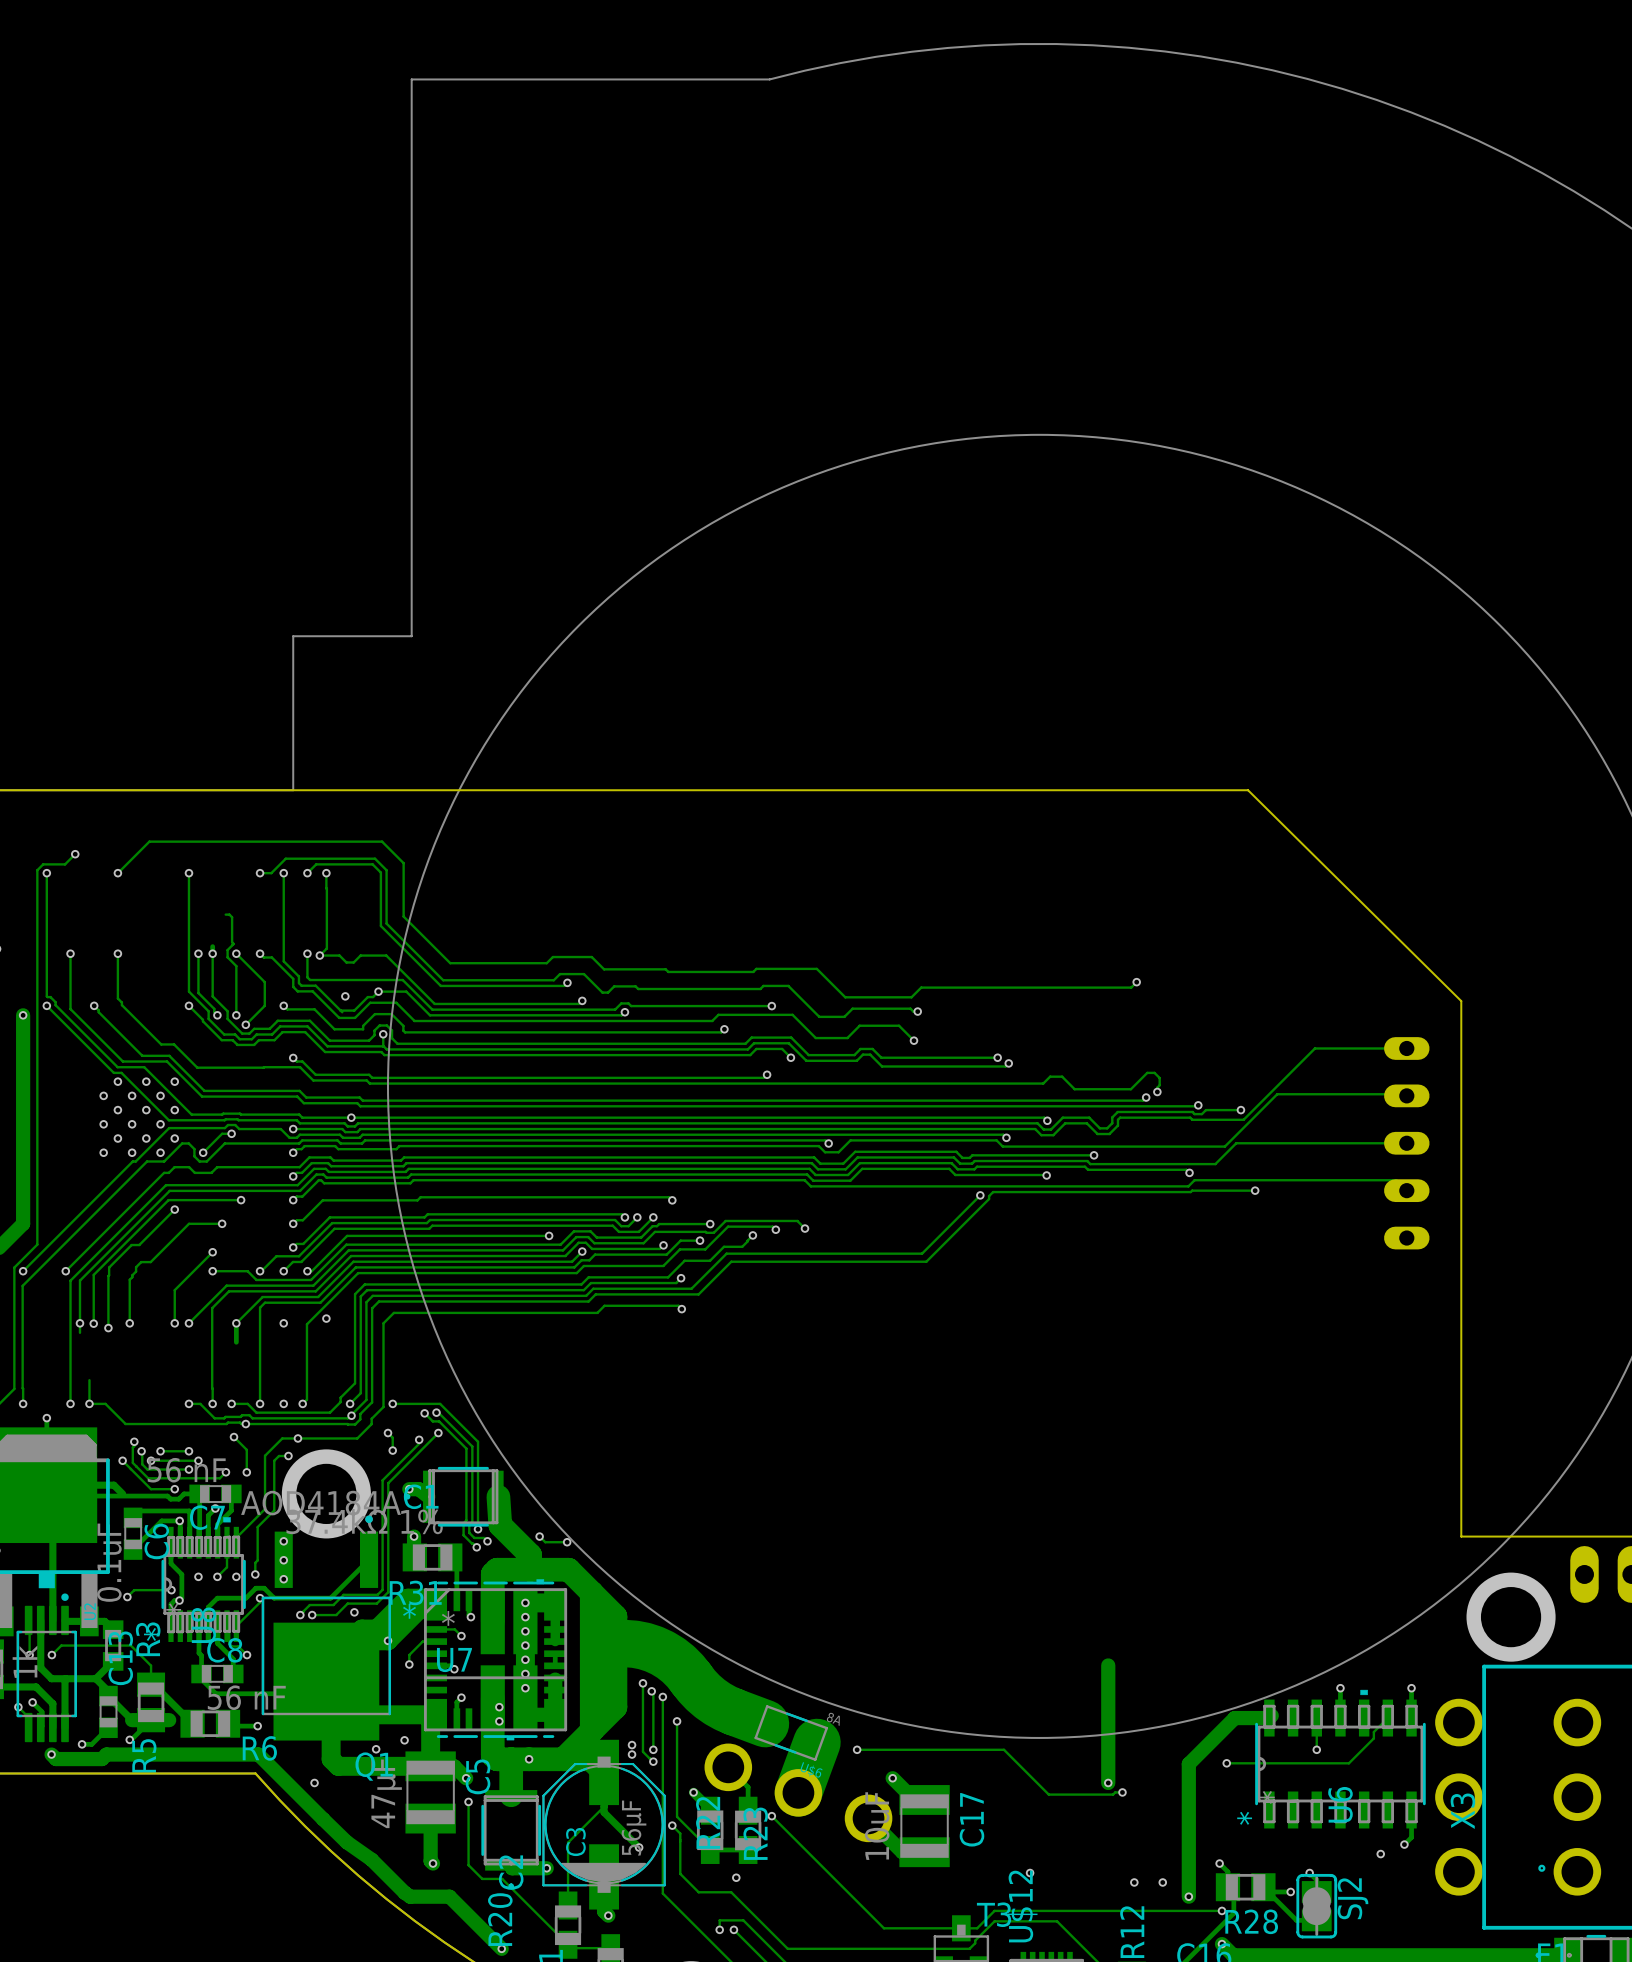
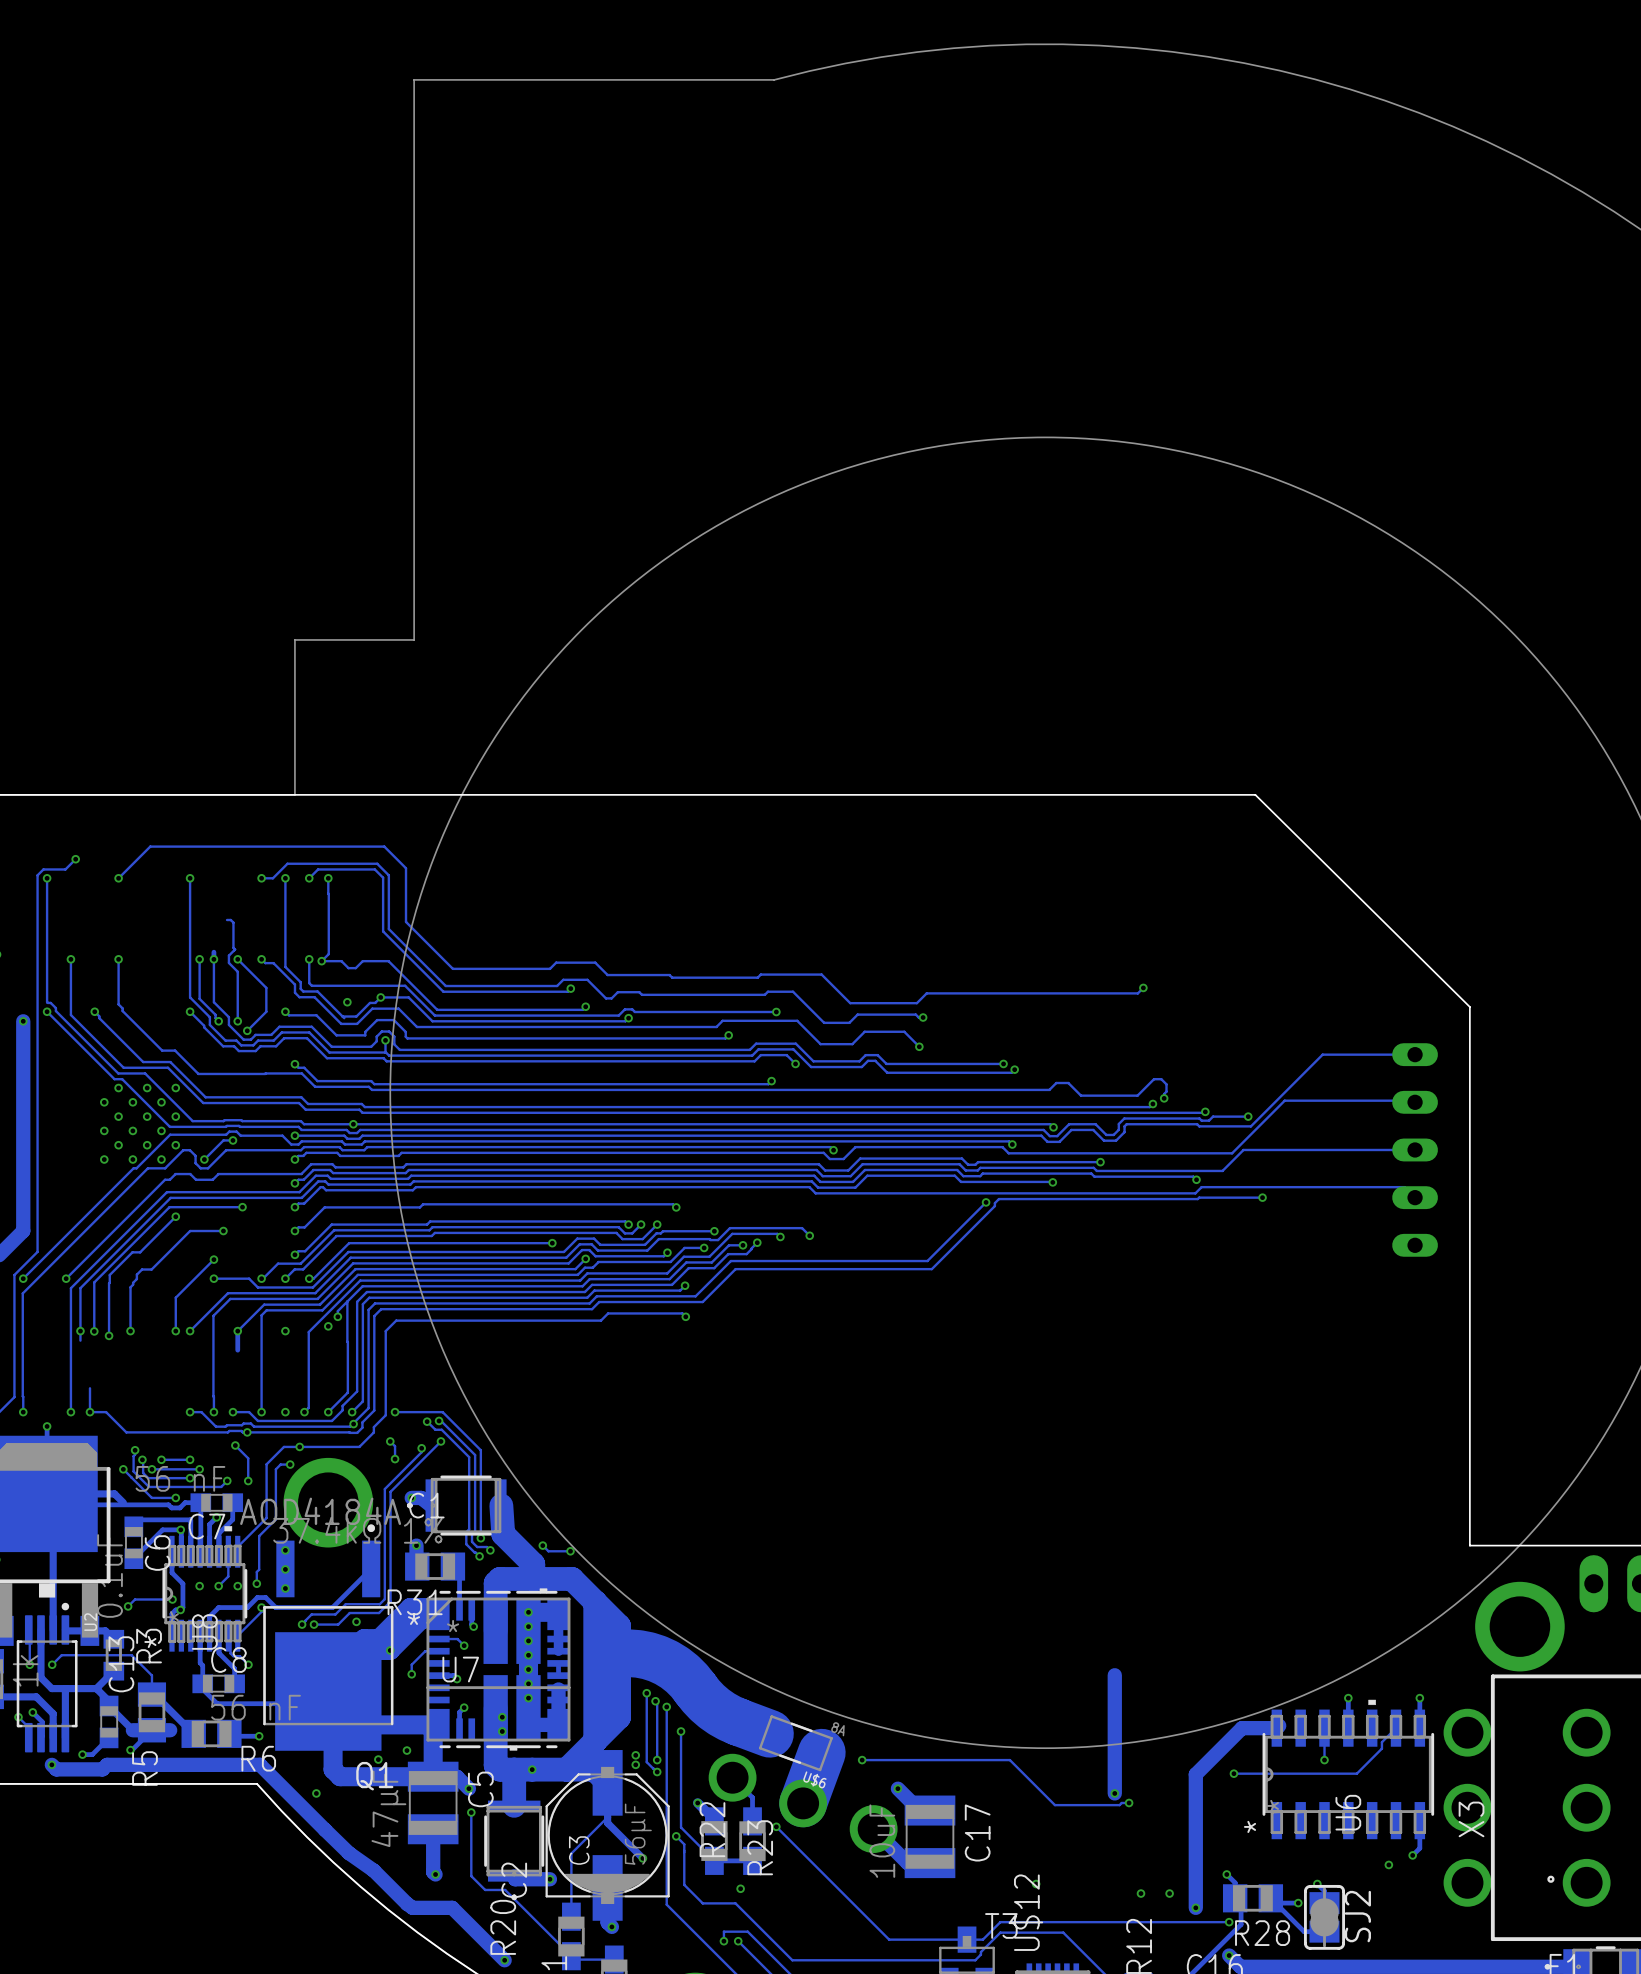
track: none -> (742, 1245) (728, 1245) (711, 1262) (686, 1262) (669, 1279) (589, 1279) (582, 1286) (362, 1286) (337, 1311) (337, 1316)
via: none -> (742, 1245)
track: none -> (347, 1301) (347, 1392) (328, 1412)
via: none -> (337, 1316)
via: none -> (328, 1412)

